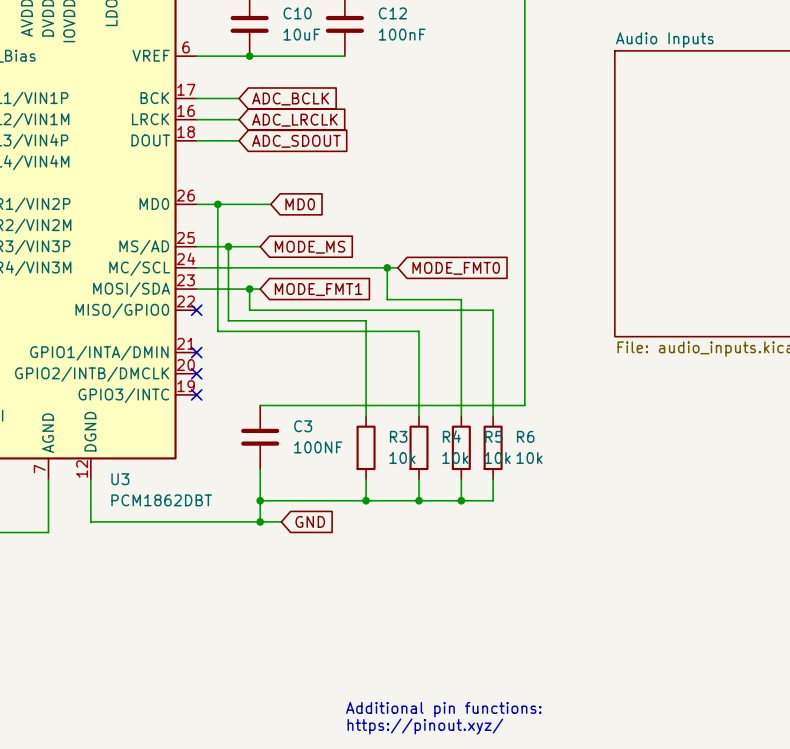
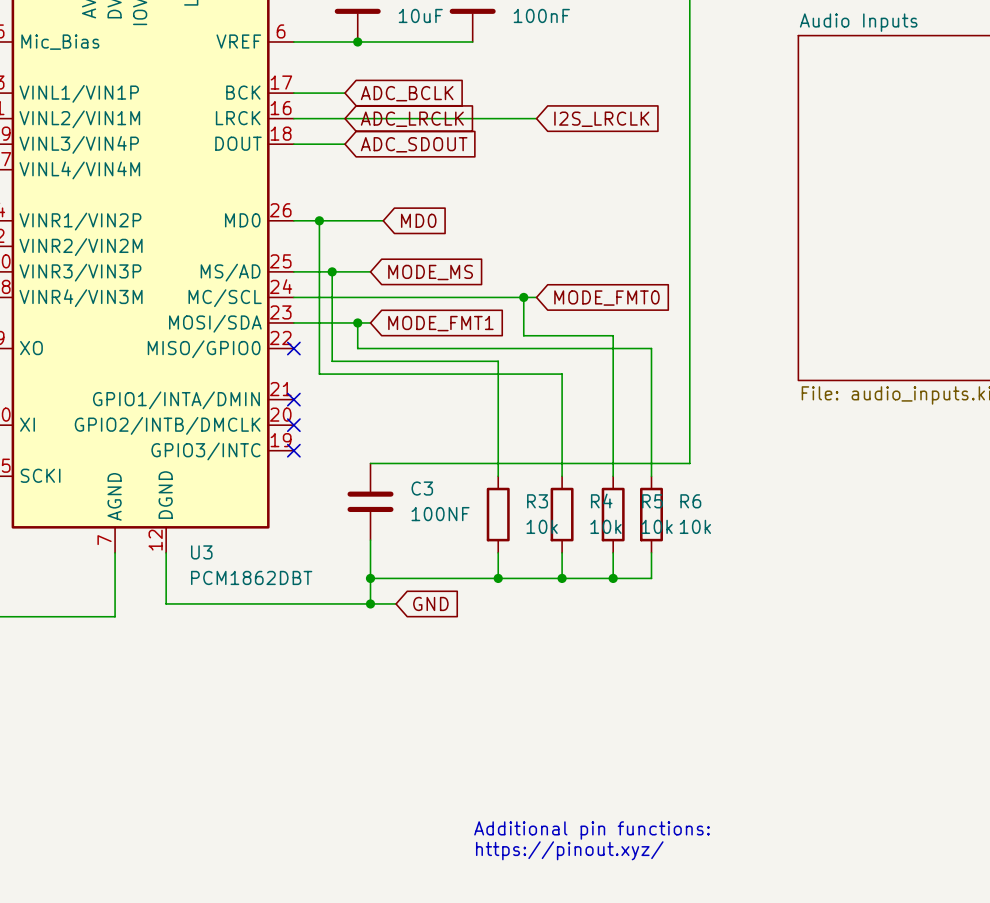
wire: none -> (344, 118) (536, 118)
global label: none -> I2S_LRCLK (601, 119)

